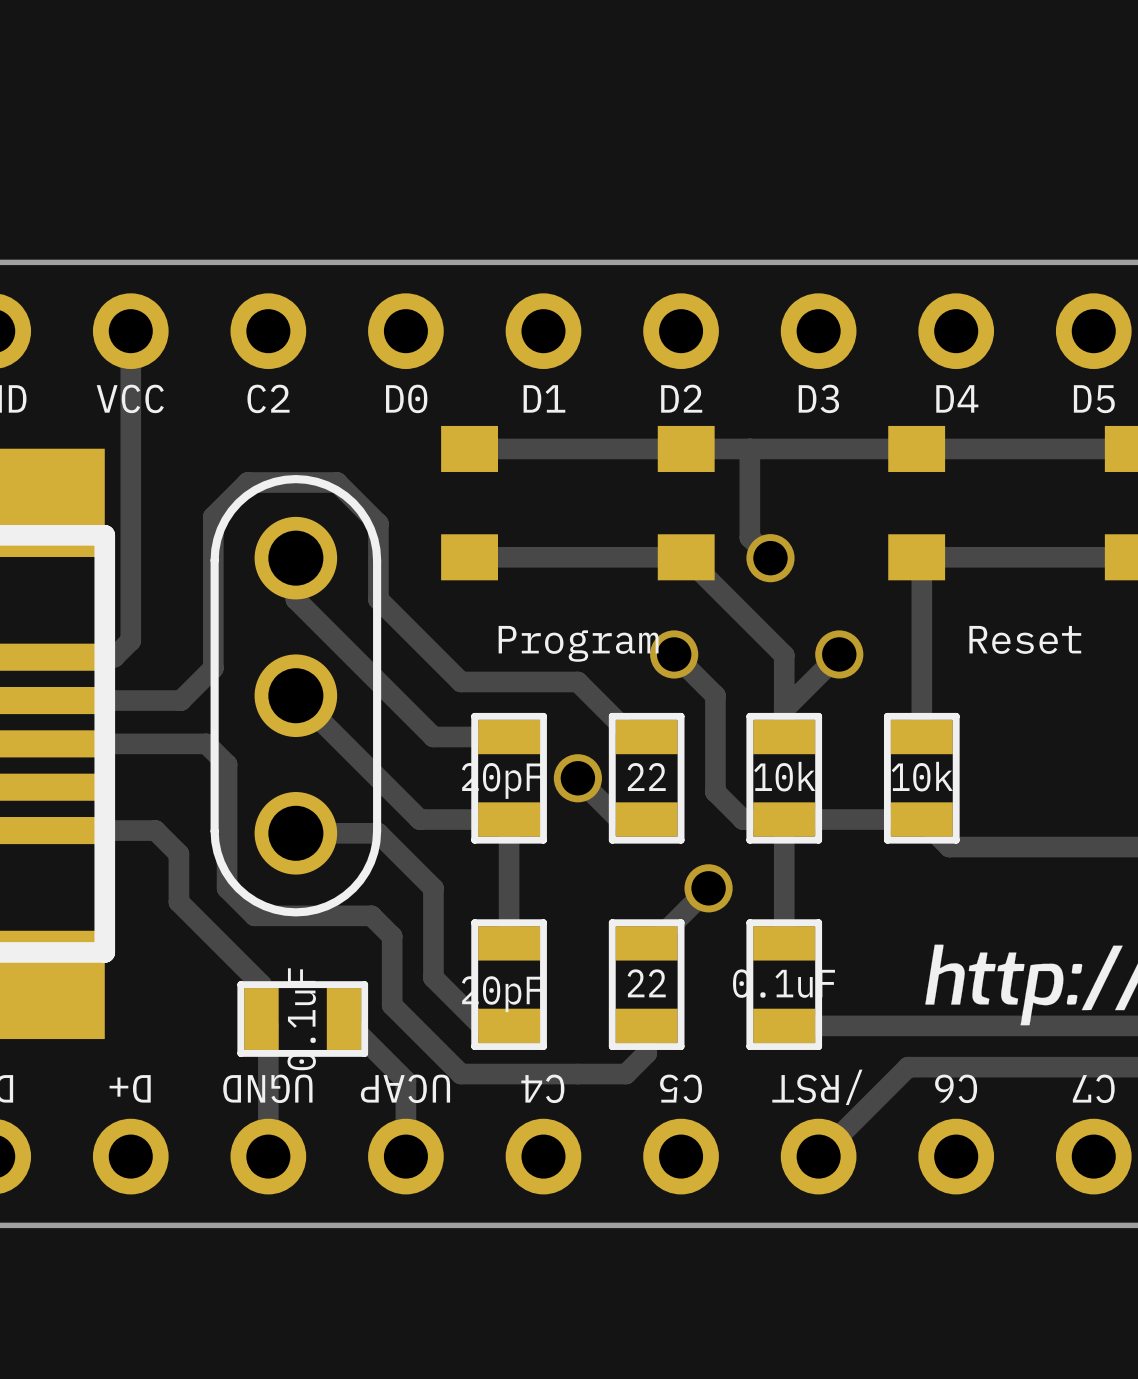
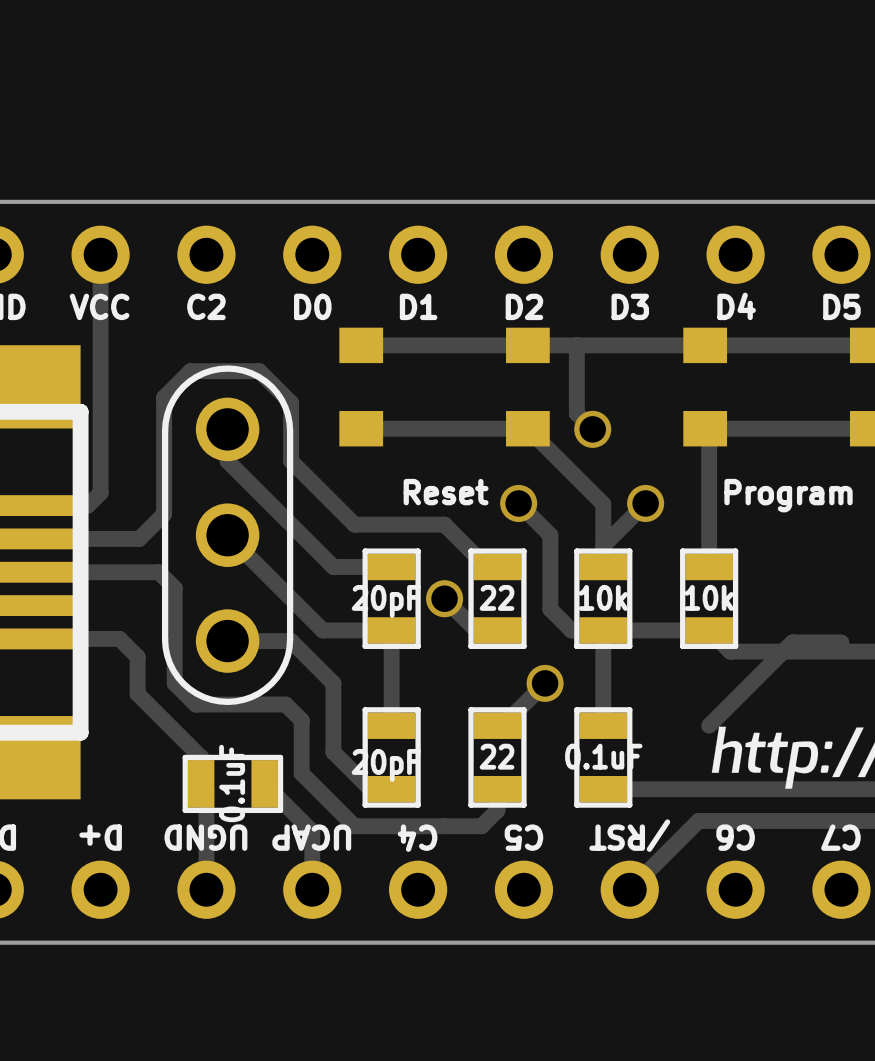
text: Reset (1025, 639) -> Program (788, 495)
text: Program (578, 643) -> Reset (446, 492)
track: none -> (841, 642) (792, 642) (709, 725)

